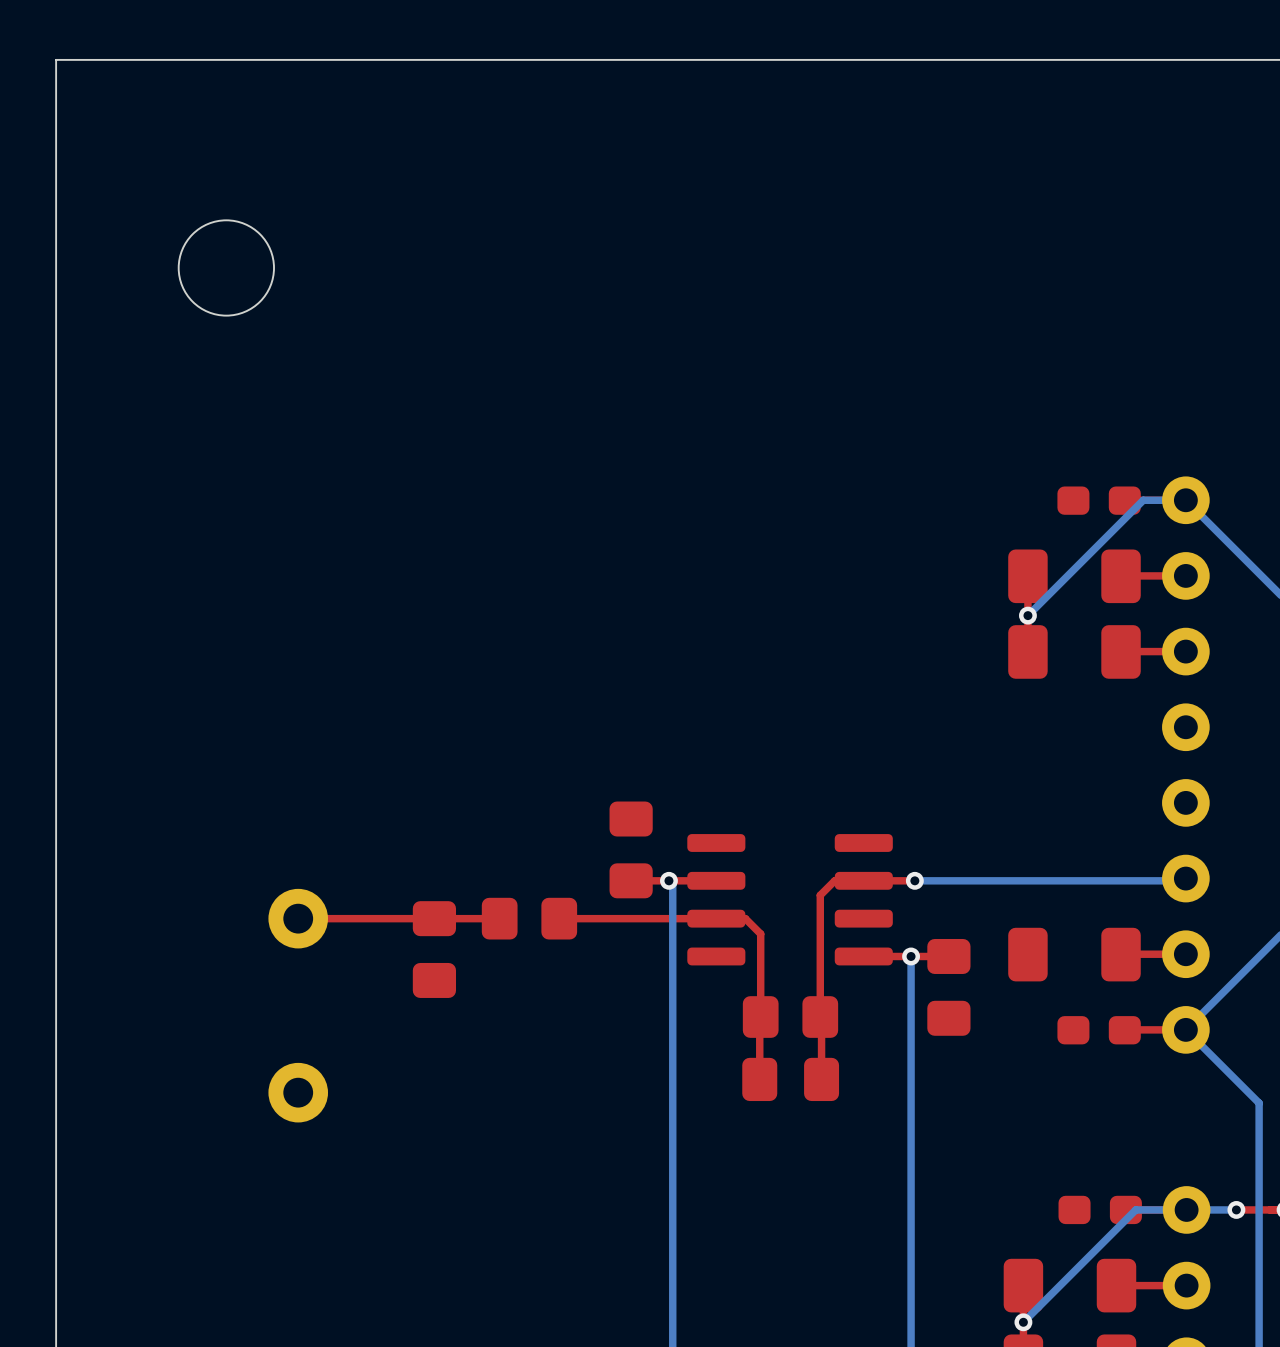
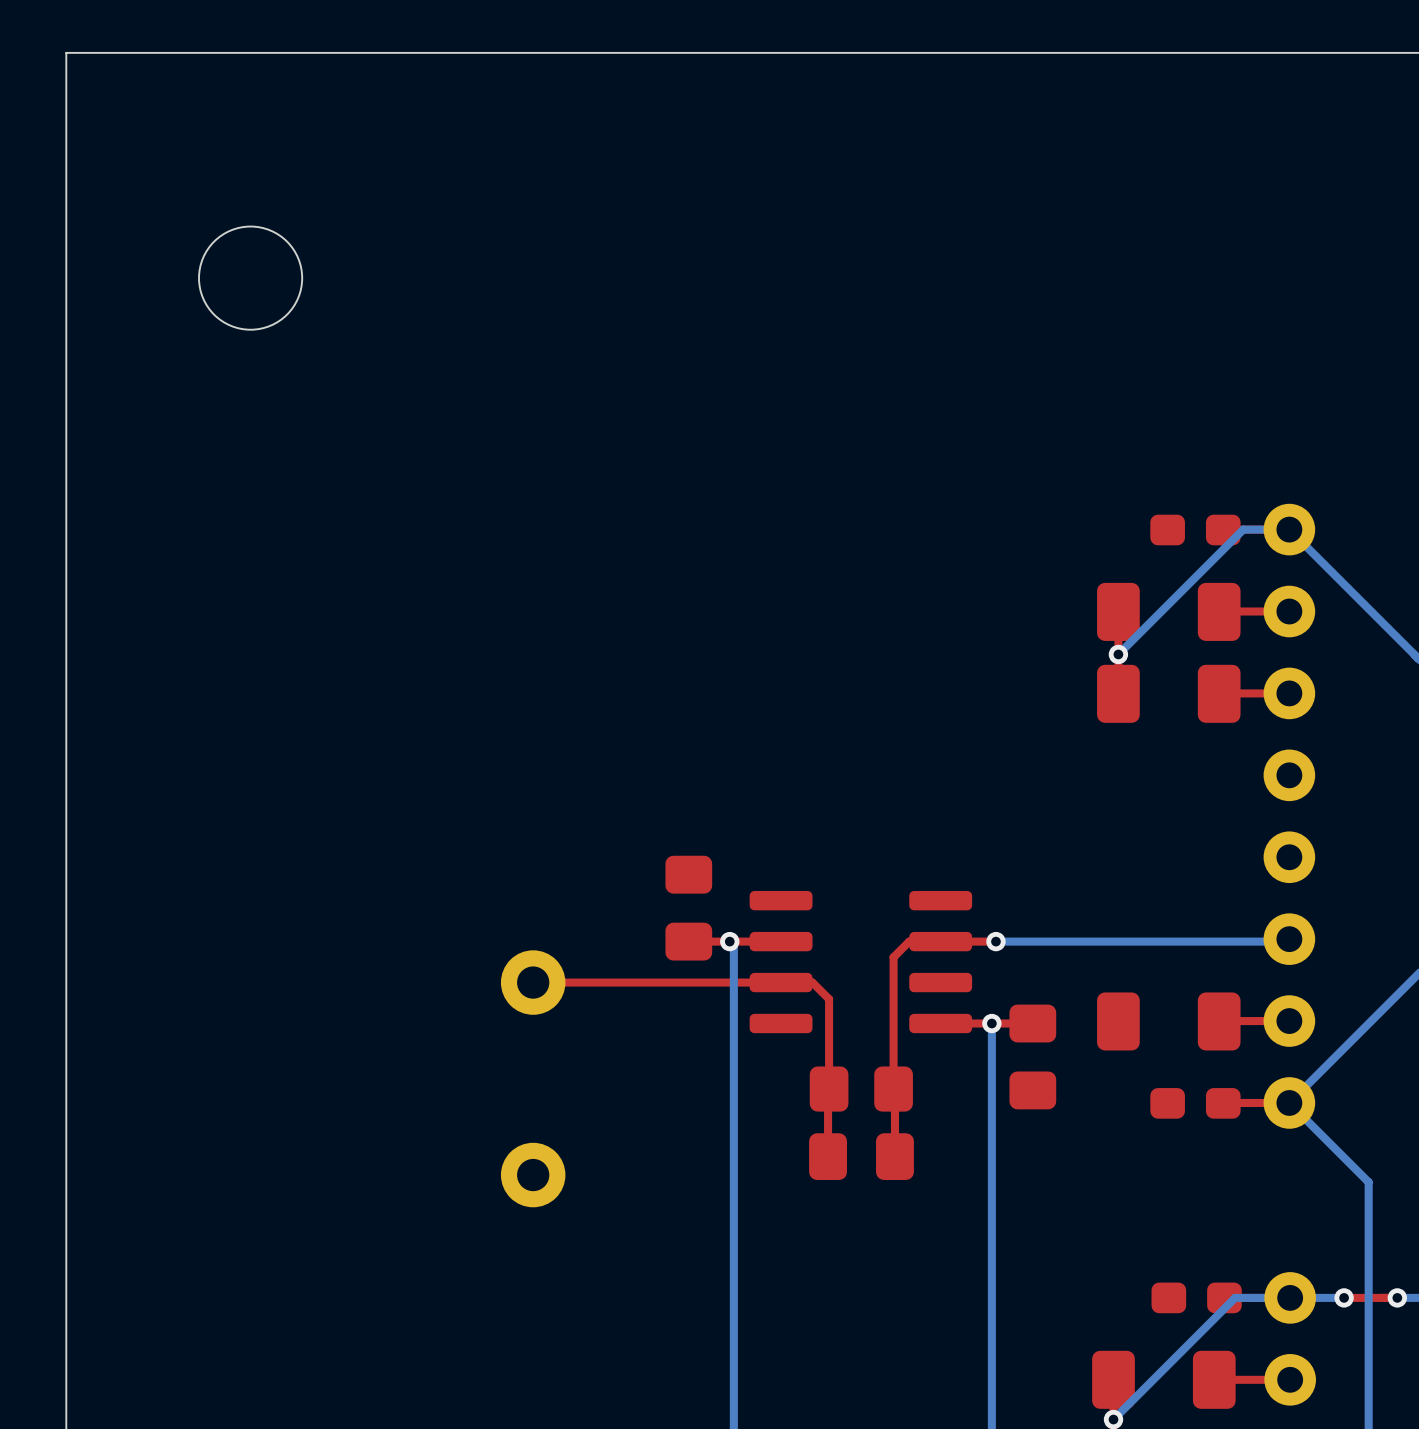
part: (298, 918) -> none
top track: (487, 918) (298, 918) -> none
part: none -> (533, 982)
part: (529, 918) -> none
top track: none -> (611, 982) (546, 982)
part: (434, 949) -> none
part: (298, 1092) -> none
part: none -> (533, 1175)

